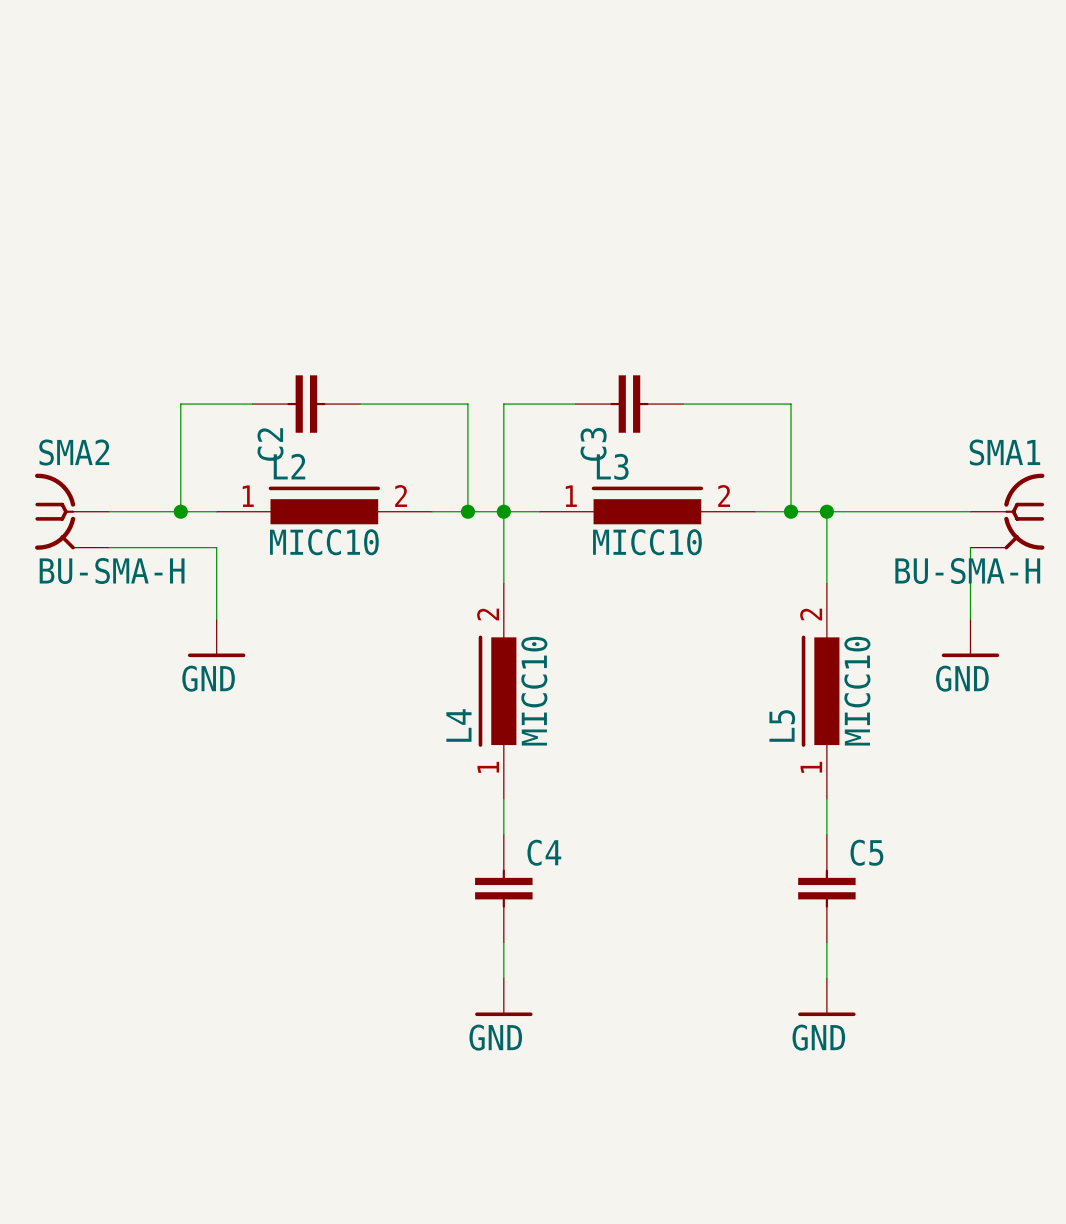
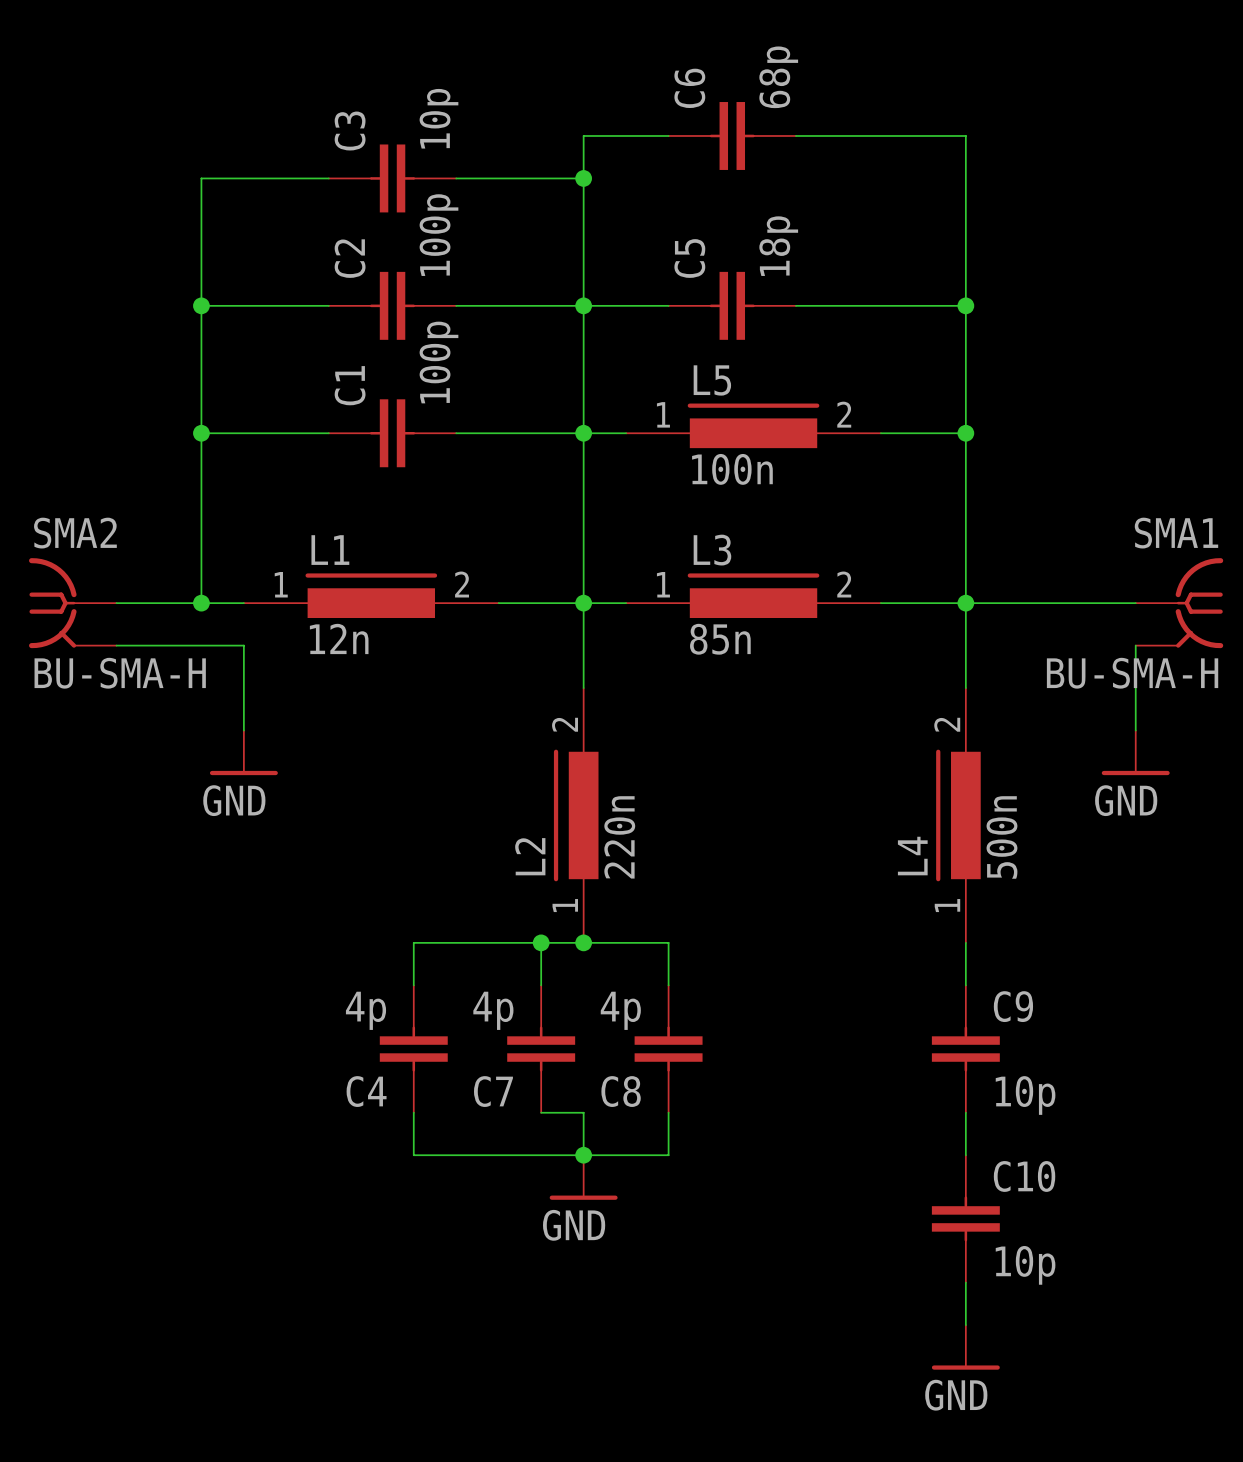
C3 value: none -> 10p (438, 118)
C6: none -> 68p (732, 135)
wire: none -> (795, 135) (965, 135) (965, 603)
wire: none -> (456, 178) (583, 178)
junction: none -> (583, 178)
C2 value: none -> 100p (438, 235)
wire: none -> (201, 305) (328, 305)
junction: none -> (201, 305)
wire: none -> (456, 305) (668, 305)
junction: none -> (583, 305)
C5: none -> 18p (732, 305)
wire: none -> (795, 305) (965, 305)
junction: none -> (965, 305)
L5: none -> 100n (753, 425)
wire: none -> (201, 433) (328, 433)
junction: none -> (201, 433)
C1: none -> 100p (392, 433)
wire: none -> (456, 433) (626, 433)
junction: none -> (583, 433)
wire: none -> (880, 433) (965, 433)
junction: none -> (965, 433)
wire: (180, 404) (252, 404) -> (201, 475) (201, 178) (328, 178)
C2 position: (306, 404) -> (392, 305)
wire: (360, 404) (467, 404) (467, 511) -> none
wire: (503, 404) (575, 404) -> (583, 475) (583, 135) (668, 135)
C3 position: (629, 404) -> (392, 178)
wire: (683, 404) (790, 404) (790, 511) -> none
C2 name position: C2 (270, 444) -> C2 (350, 258)
C3 name position: C3 (593, 444) -> C3 (350, 131)
L2 name: L2 (289, 466) -> L1 (330, 550)
junction: (467, 511) -> none
junction: (790, 511) -> none
L2 value: MICC10 (324, 542) -> 12n (339, 638)
L3 value: MICC10 (647, 542) -> 85n (720, 639)
L4 value: MICC10 (534, 691) -> 220n (619, 837)
L5 value: MICC10 (857, 691) -> 500n (1001, 837)
L4 name: L4 (458, 725) -> L2 (530, 856)
L5 name: L5 (782, 725) -> L4 (912, 856)
junction: none -> (541, 942)
wire: (503, 798) (503, 834) -> (541, 942) (541, 985)
junction: none -> (583, 942)
wire: none -> (413, 985) (413, 942) (668, 942) (668, 985)
C4 name position: C4 (544, 852) -> C4 (366, 1091)
C5 name: C5 (866, 852) -> C9 (1013, 1006)
C4 value: none -> 4p (365, 1010)
C7: none -> 4p (541, 1049)
C4 position: (503, 888) -> (413, 1049)
C8: none -> 4p (668, 1049)
C5 value: none -> 10p (1025, 1095)
wire: none -> (413, 1112) (413, 1155) (668, 1155) (668, 1112)
wire: none -> (541, 1112) (583, 1112)
junction: none -> (583, 1155)
power symbol position: GND (826, 997) -> GND (965, 1347)
C10: none -> 10p (965, 1218)
wire: none -> (965, 1282) (965, 1325)

